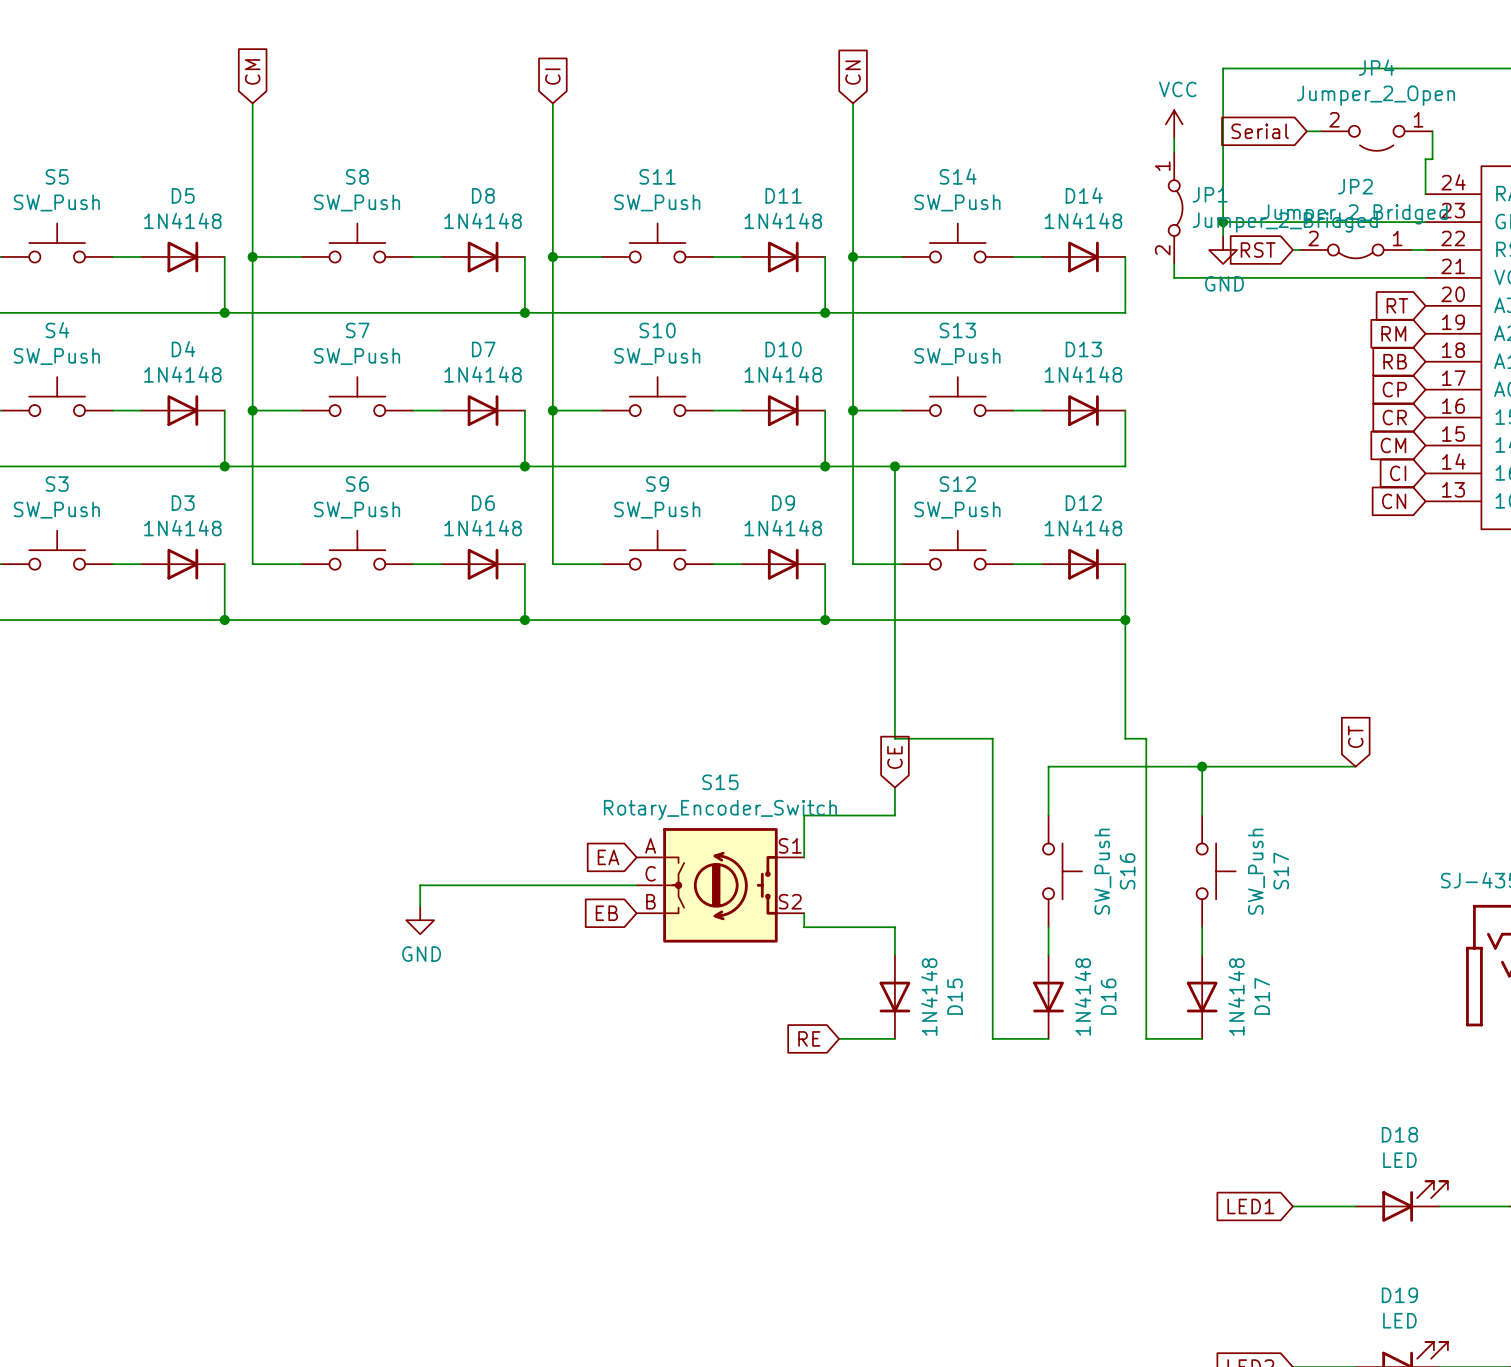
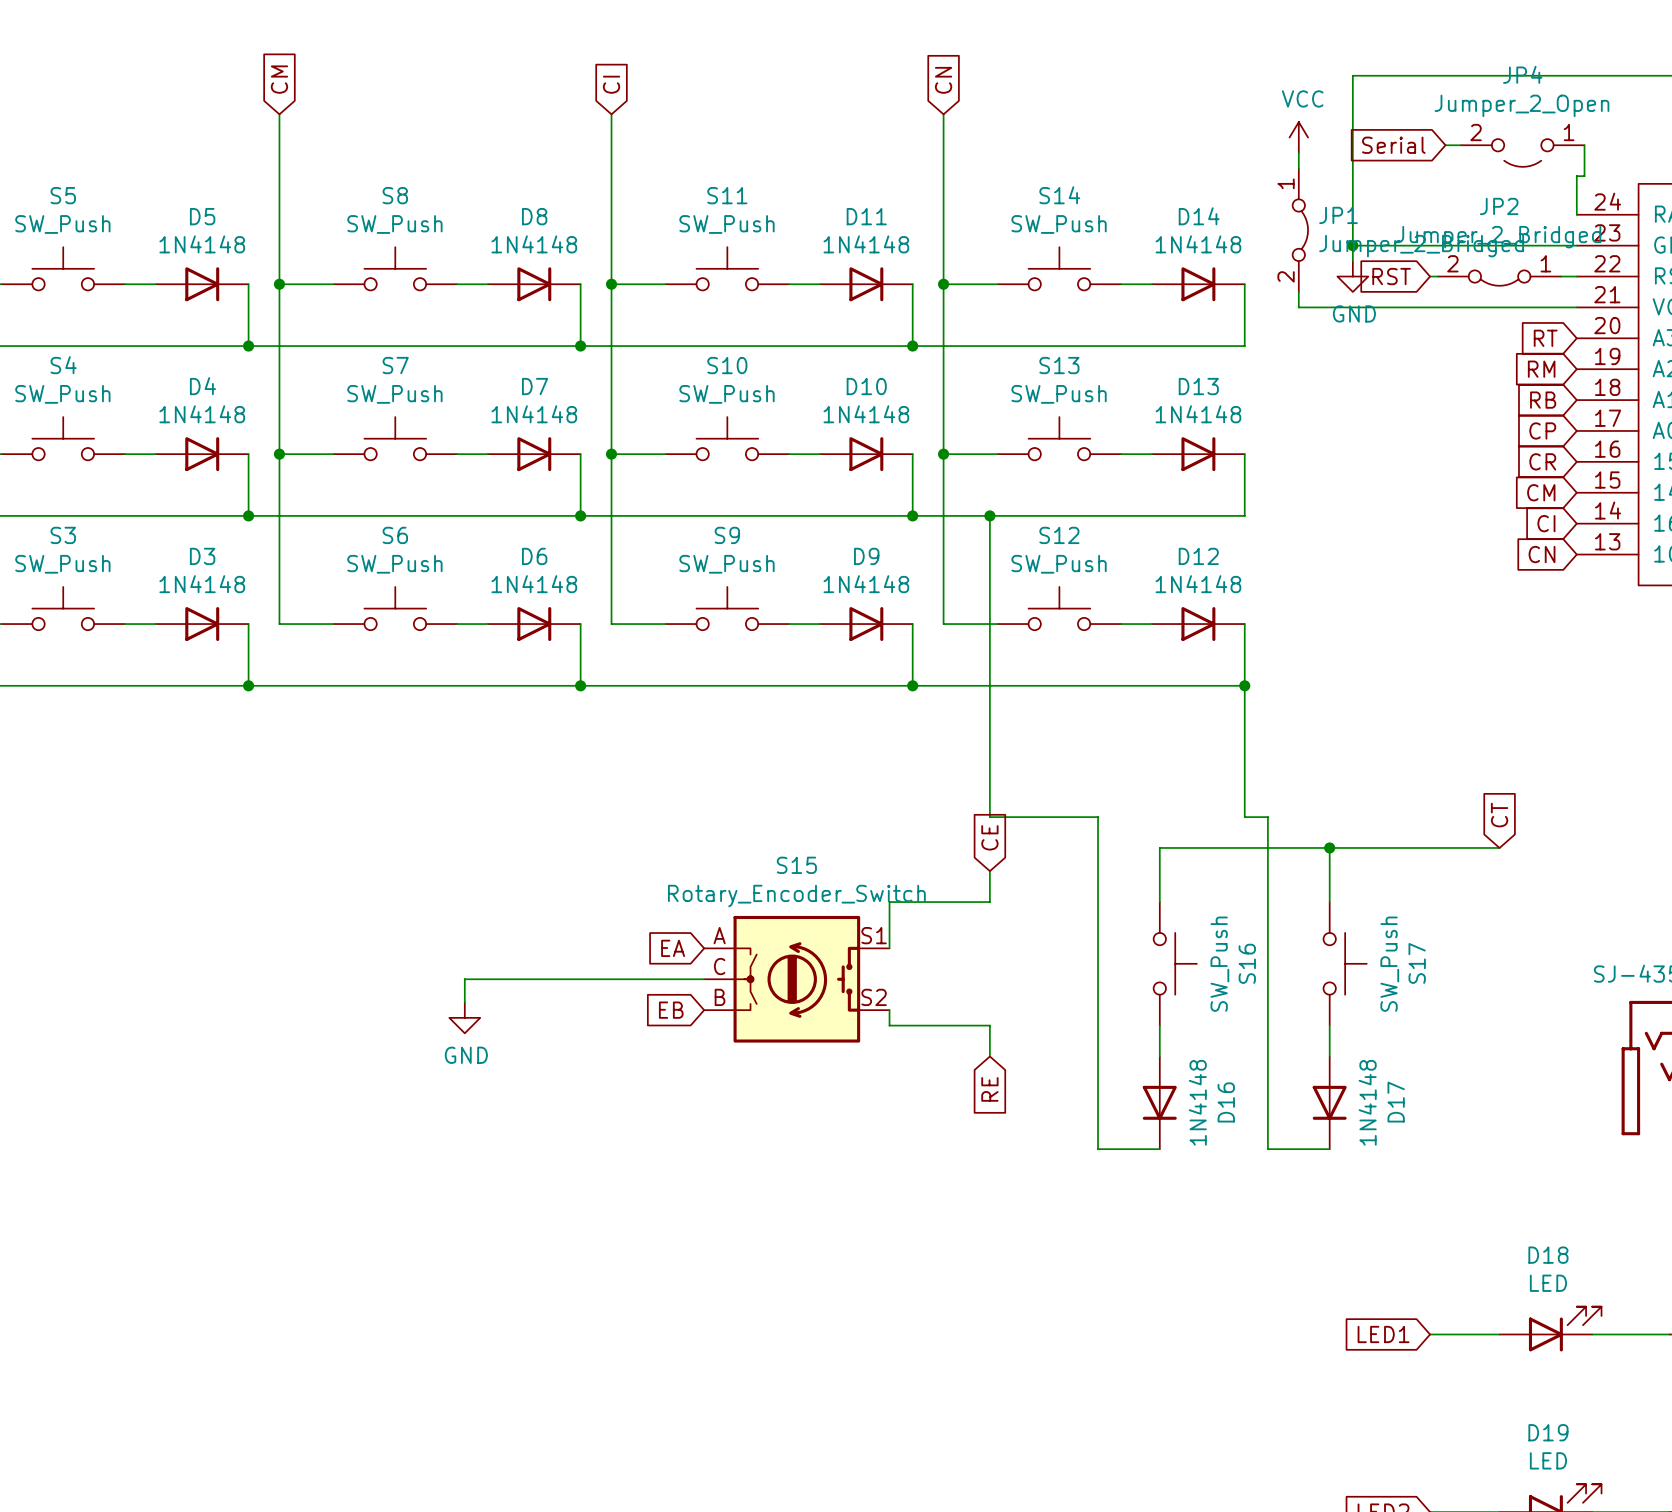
D15: 1N4148 (894, 997) -> none
global label rotation: 0° (809, 1038) -> 90° counterclockwise (989, 1089)
global label position: RE (809, 1038) -> RE (989, 1089)
wire: (839, 1038) (894, 1038) -> none

